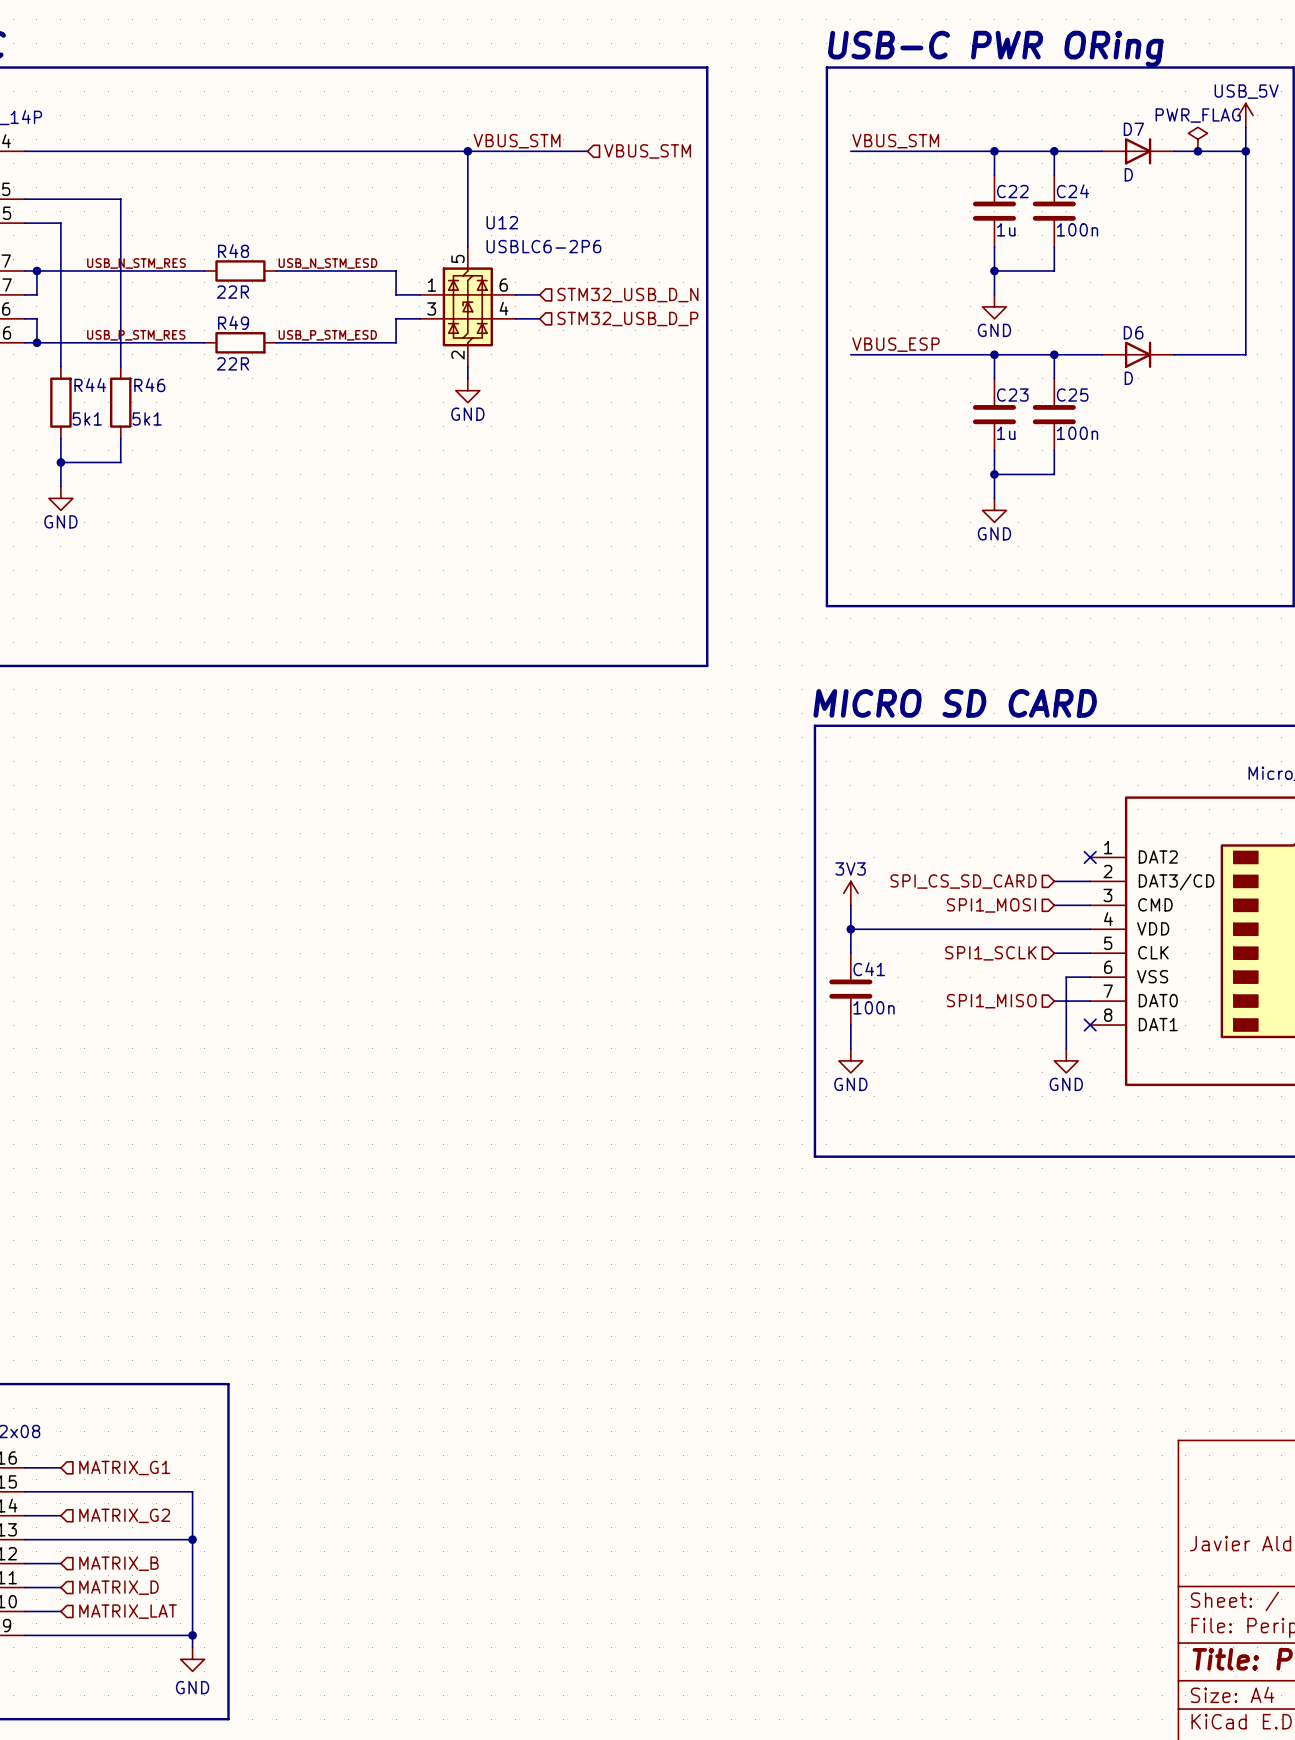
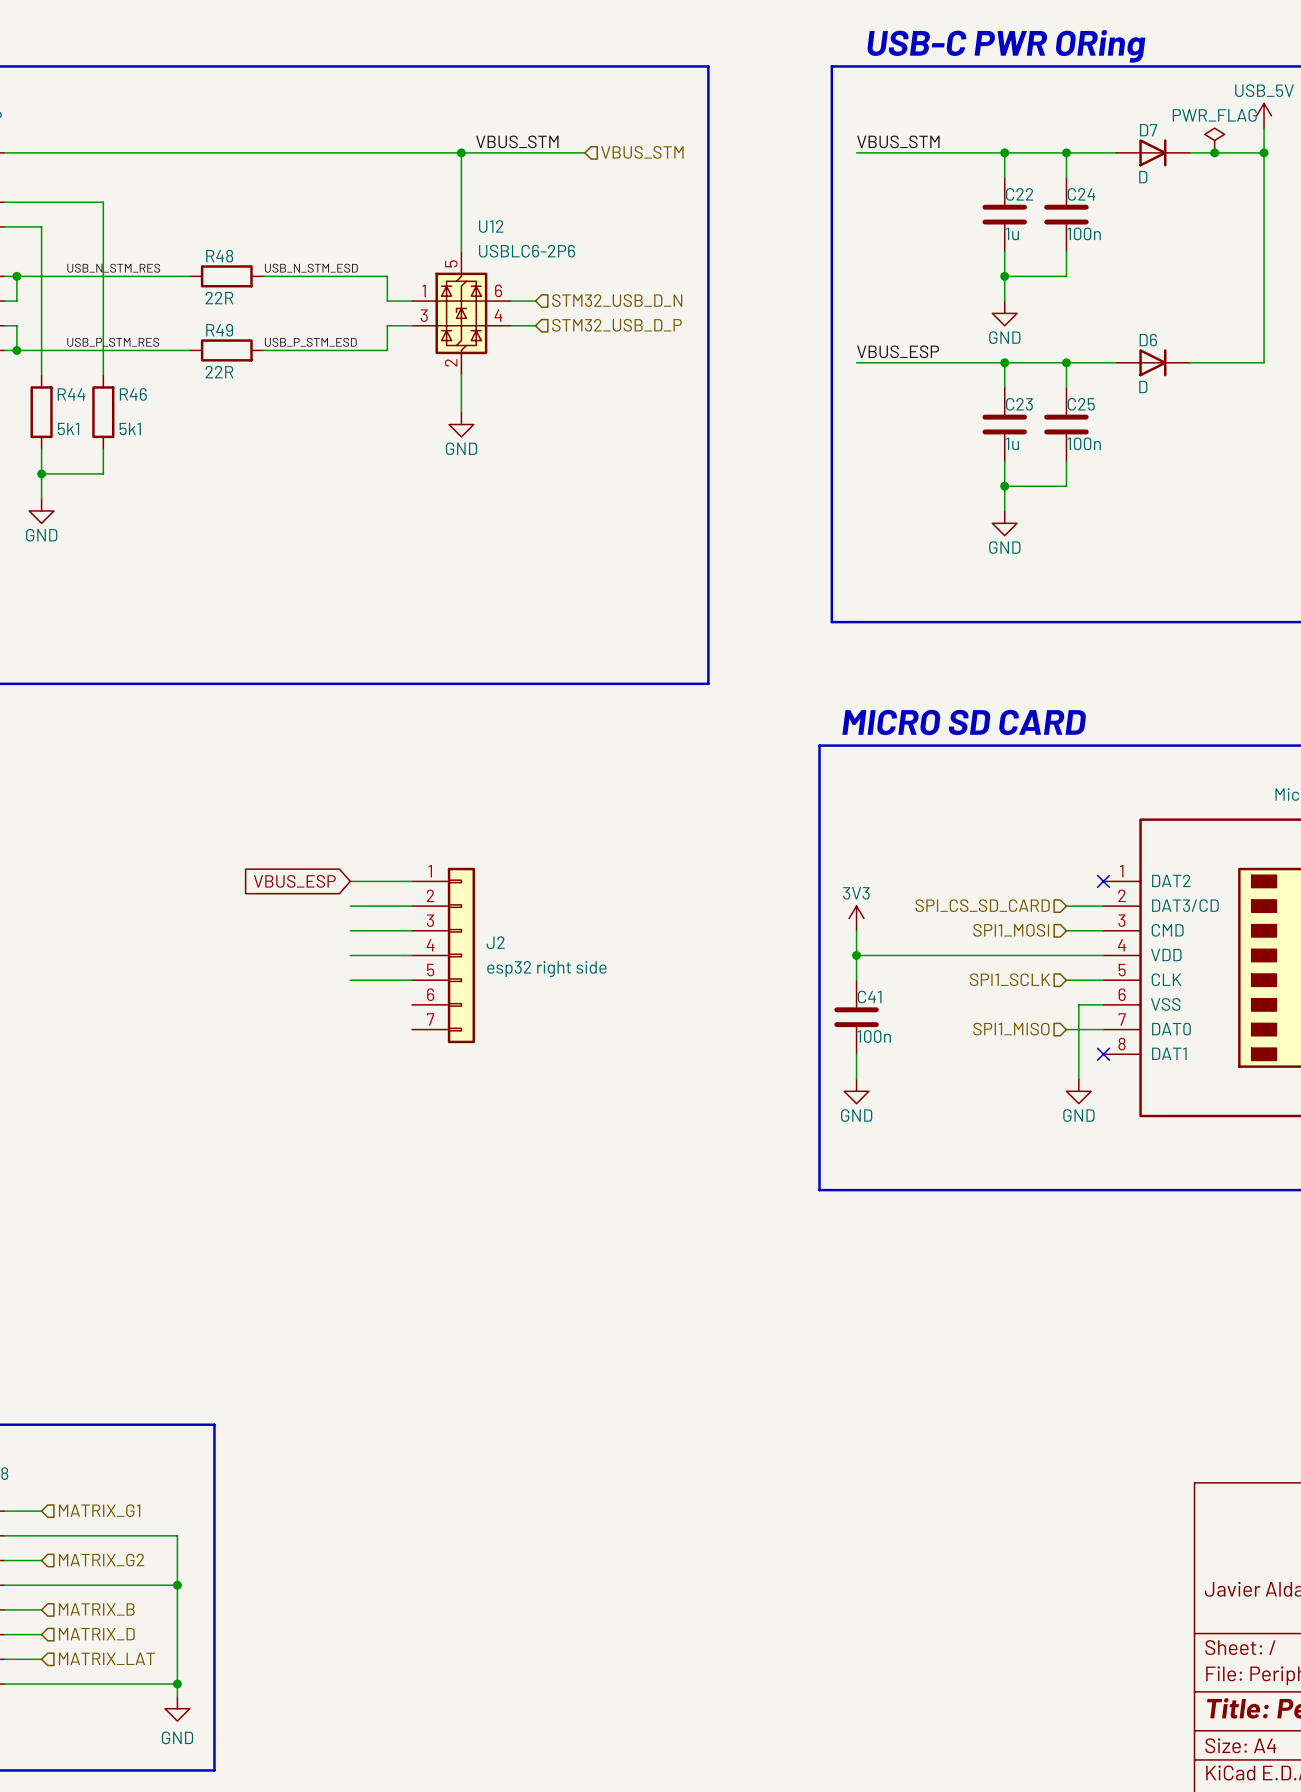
power symbol position: GND (467, 390) -> GND (461, 424)
wire: none -> (350, 881) (412, 881)
global label: none -> VBUS_ESP (294, 881)
wire: none -> (350, 906) (412, 906)
wire: none -> (350, 930) (412, 930)
wire: none -> (350, 955) (412, 955)
J2: none -> esp32 right side (443, 955)
wire: none -> (350, 980) (412, 980)

